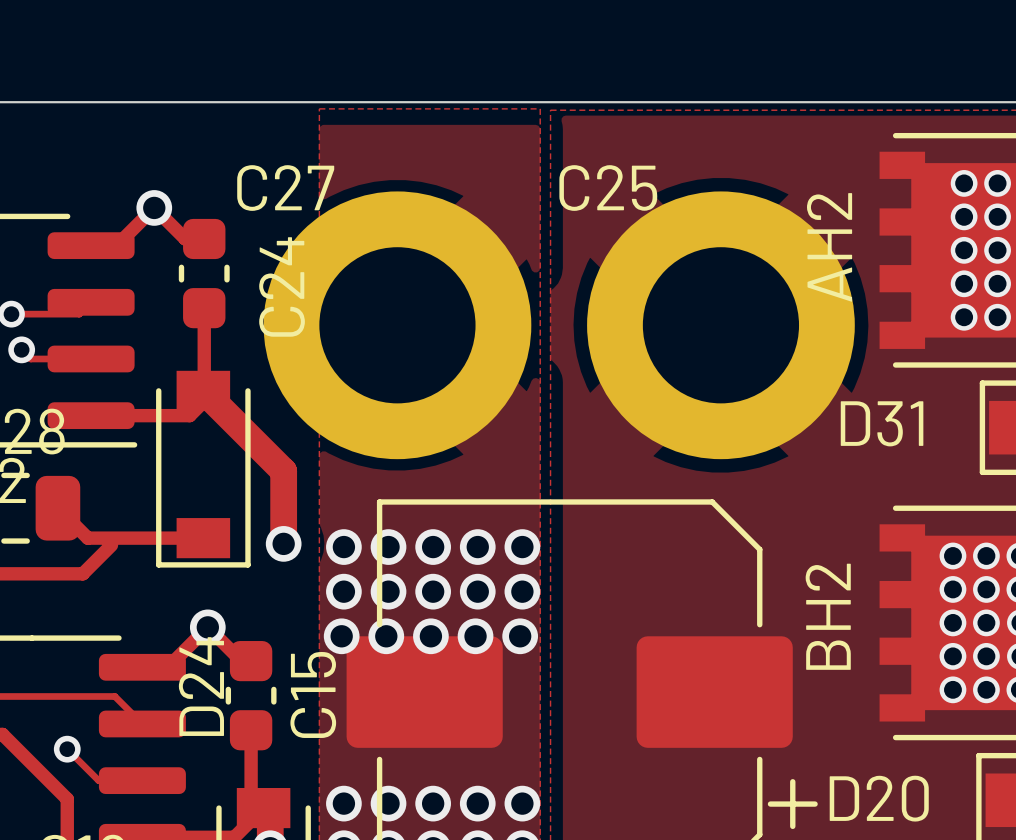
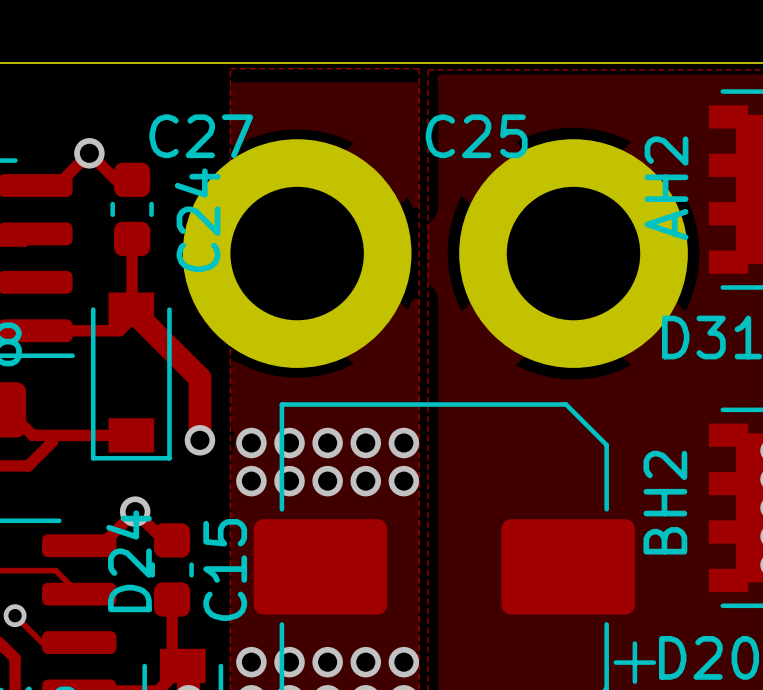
via: (341, 636) -> none
via: (386, 636) -> none
via: (430, 636) -> none
via: (475, 636) -> none
via: (520, 636) -> none

